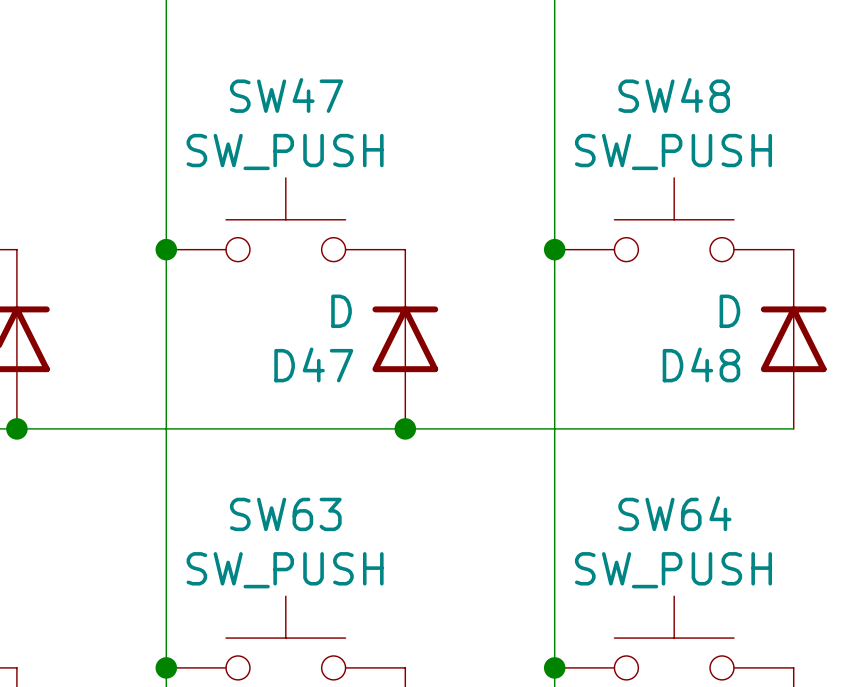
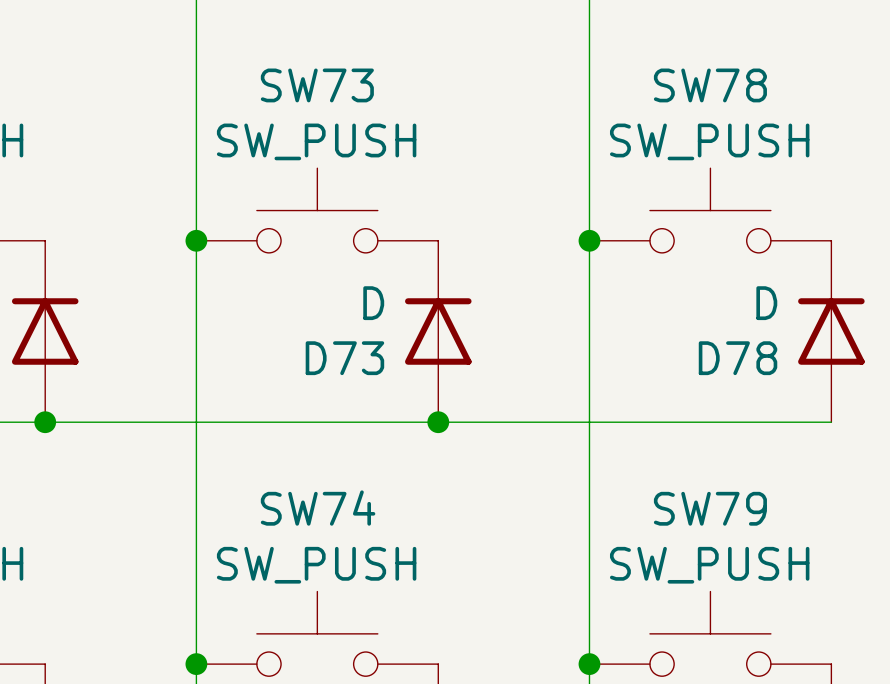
SW47 name: SW47 (286, 95) -> SW73 (317, 85)
SW48 name: SW48 (674, 95) -> SW78 (710, 85)
D47 name: D47 (313, 364) -> D73 (344, 358)
D48 name: D48 (701, 364) -> D78 (738, 358)
SW64 name: SW64 (674, 513) -> SW79 (710, 508)
SW63 name: SW63 (285, 514) -> SW74 (318, 508)

